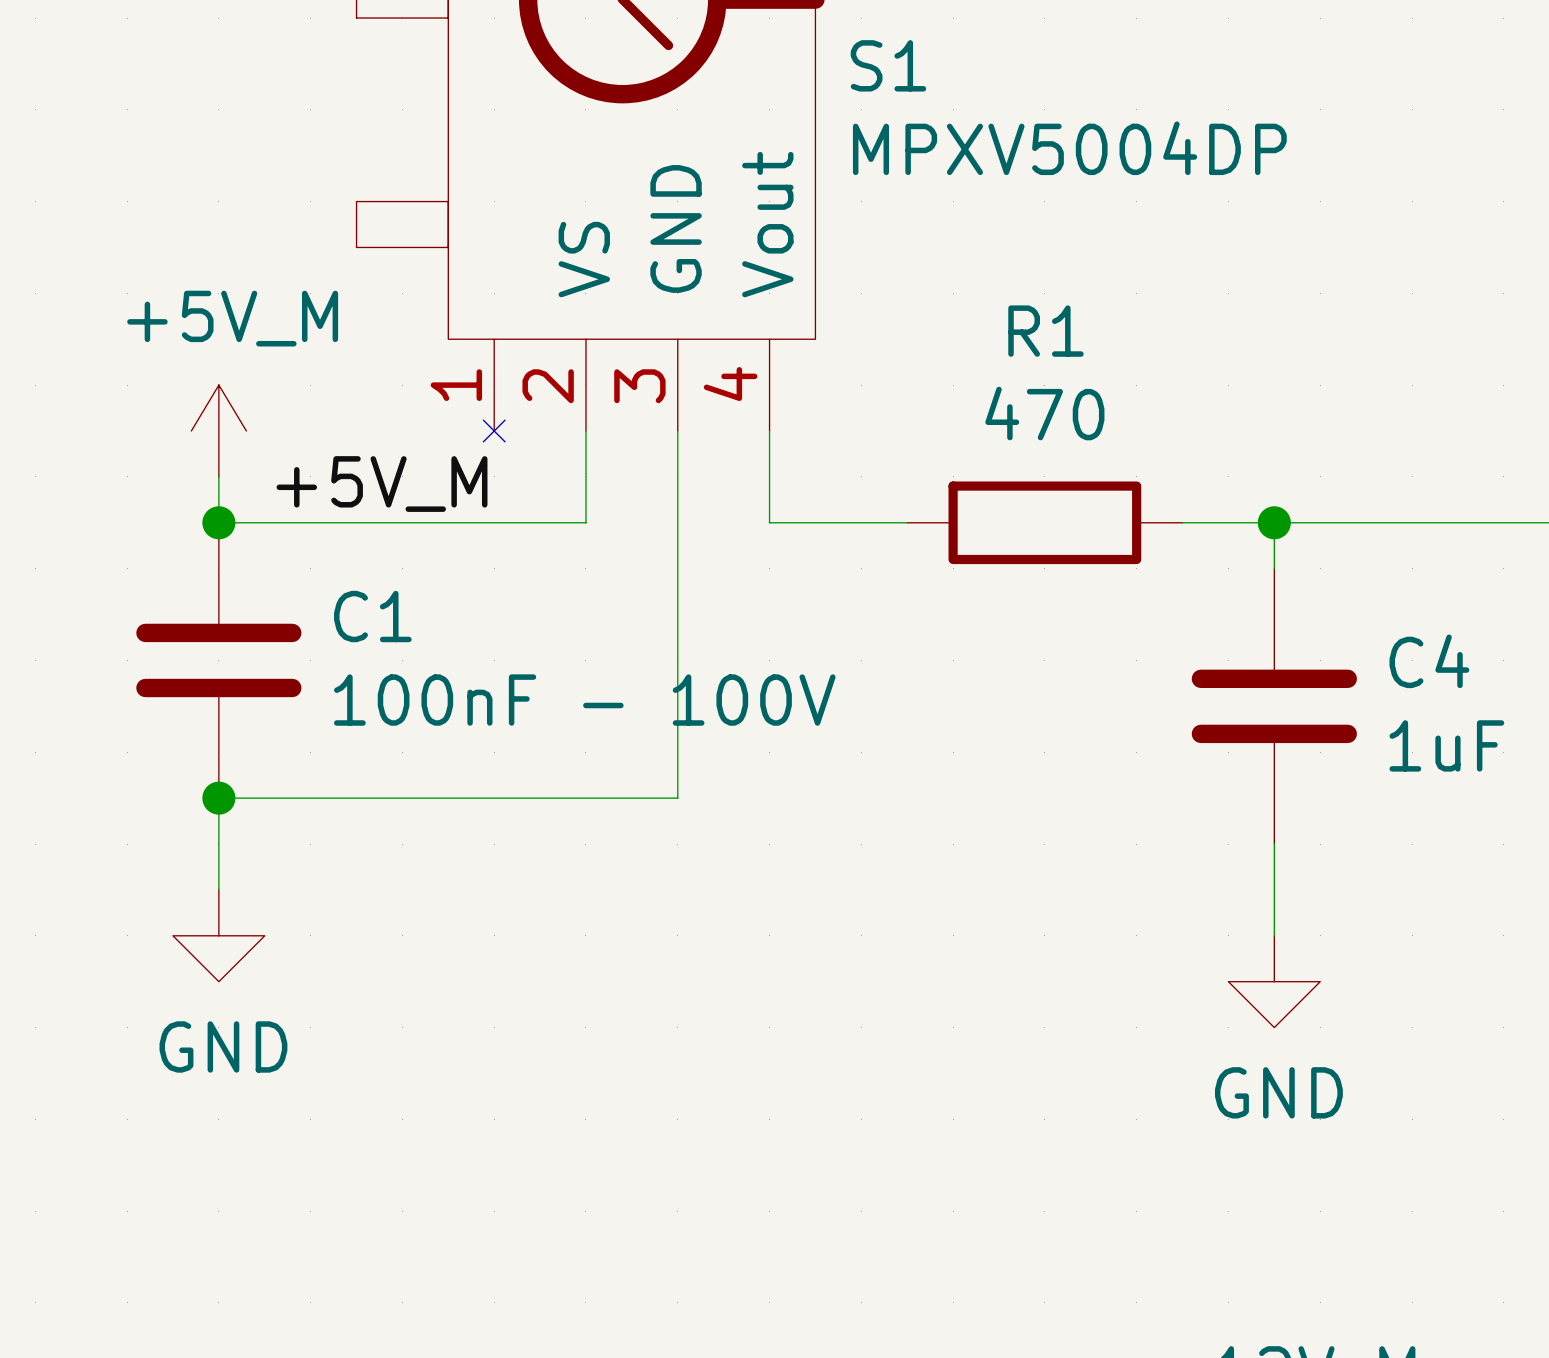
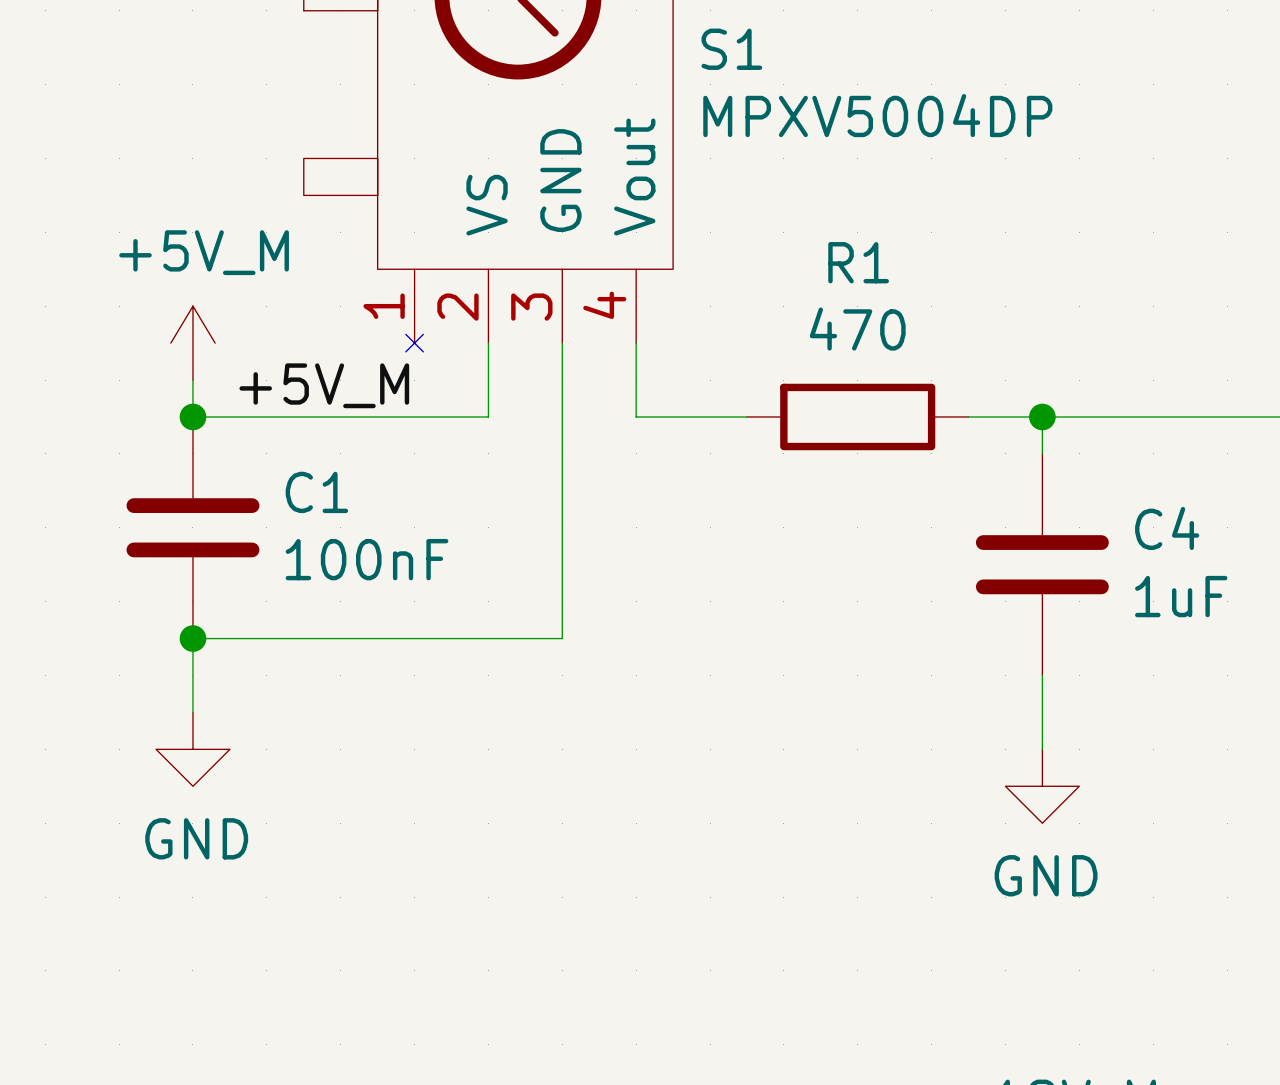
C1 value: 100nF - 100V (584, 700) -> 100nF (367, 559)

